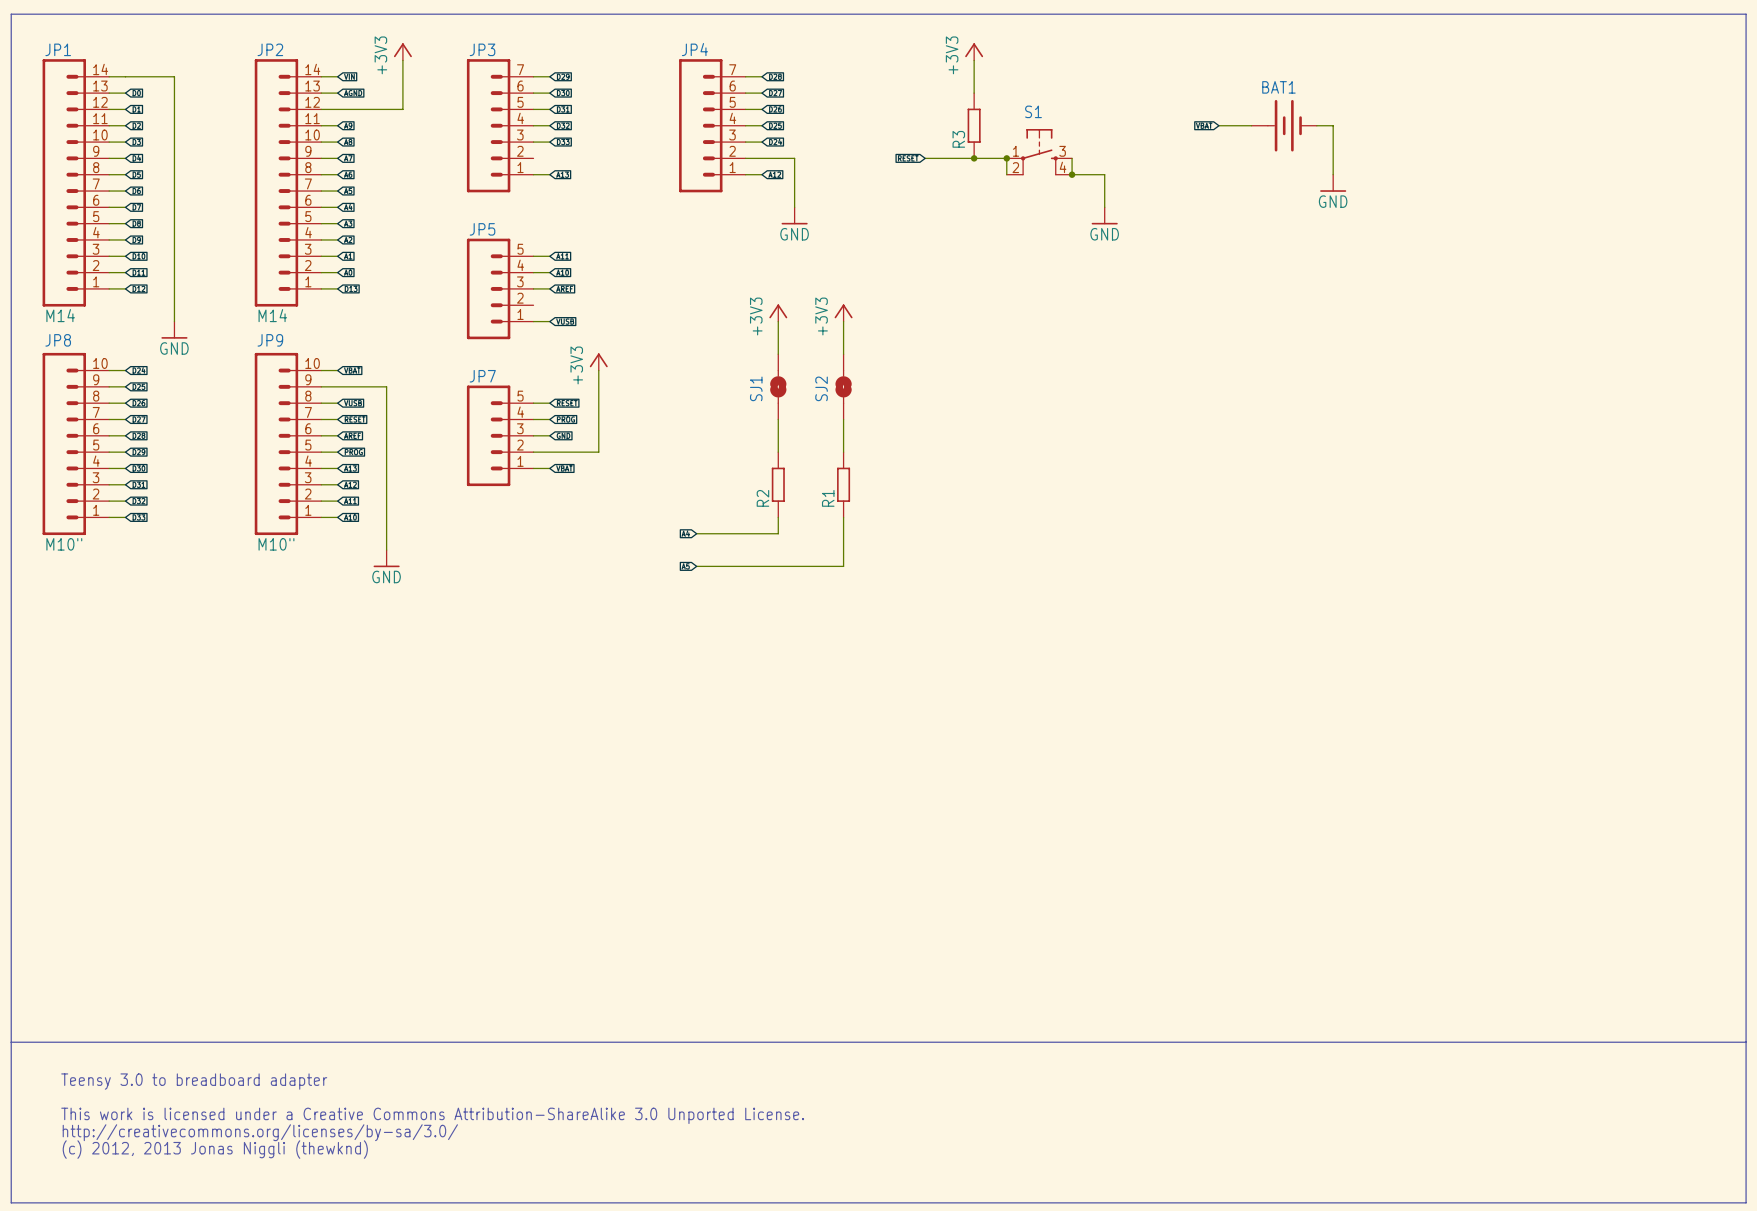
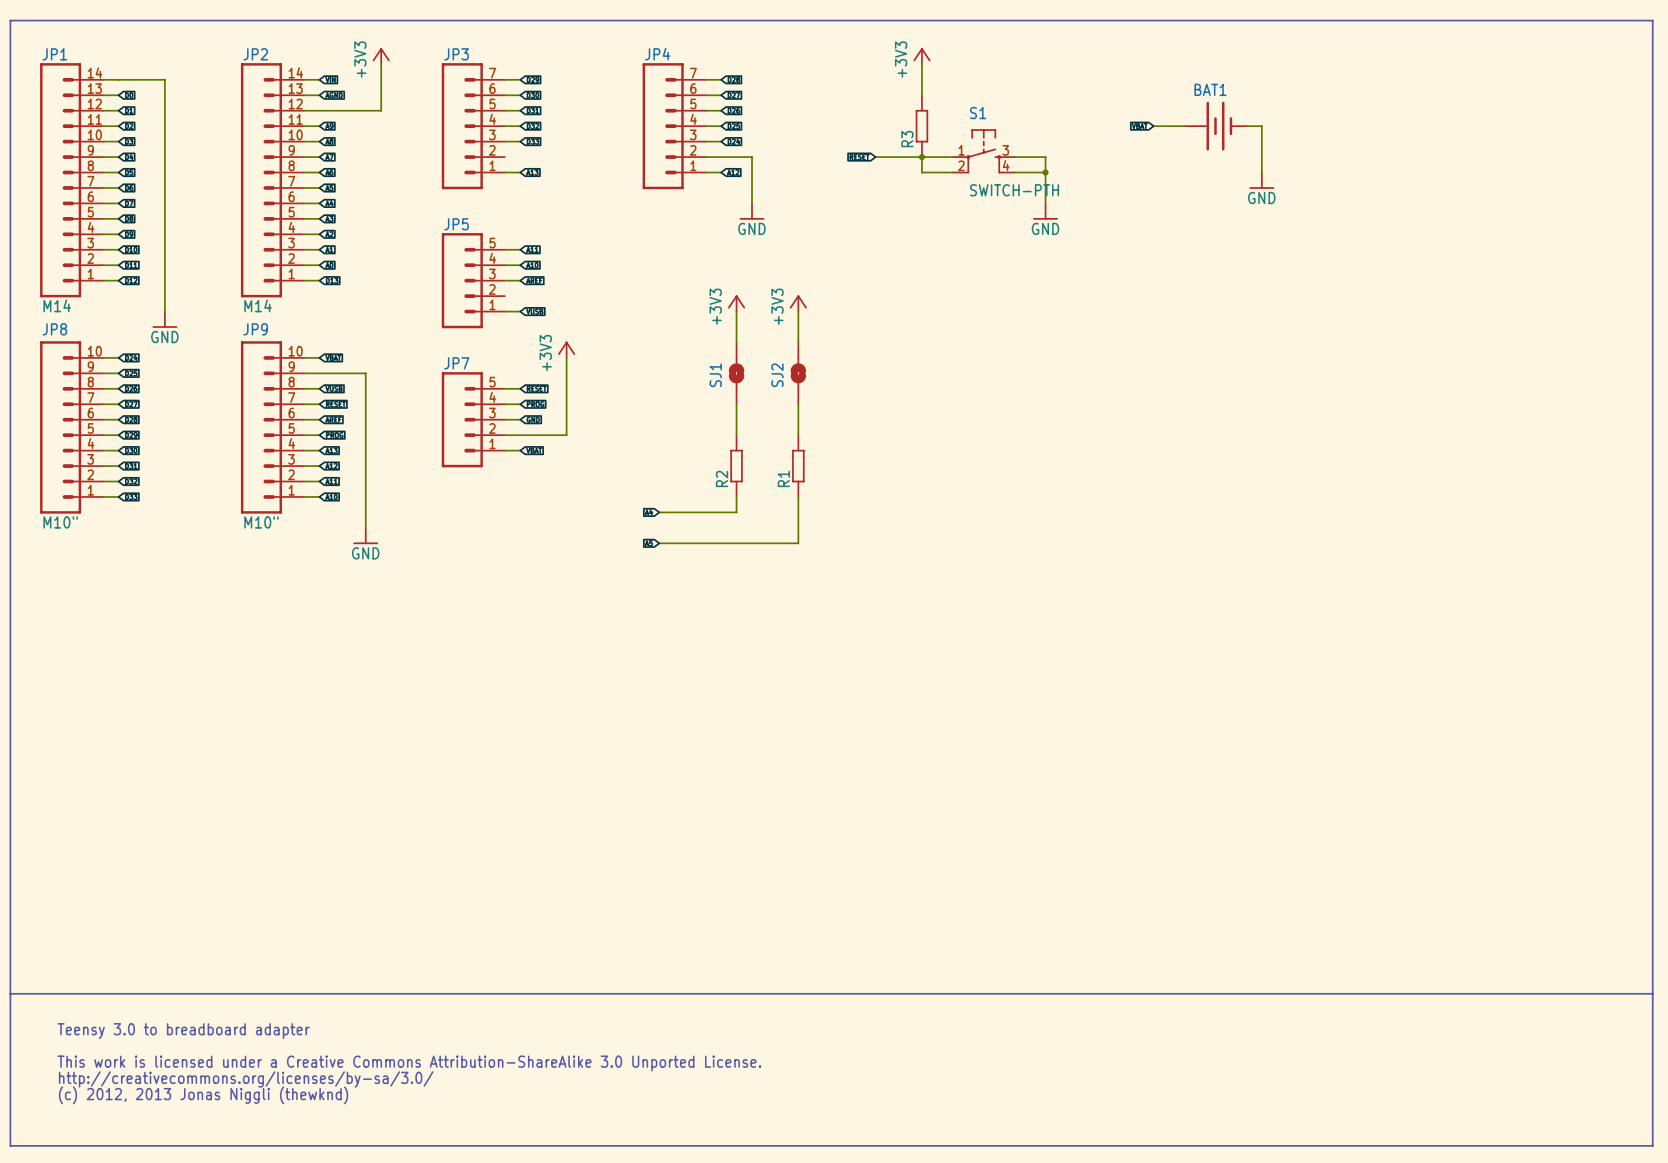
wire: (1006, 158) (1006, 174) -> (921, 157) (921, 172) (952, 172)
junction: (1006, 158) -> none
wire: (1072, 158) (1072, 174) -> (1014, 157) (1045, 157) (1045, 172)
junction position: (1072, 174) -> (1045, 172)
S1 value: none -> SWITCH-PTH (1014, 190)

